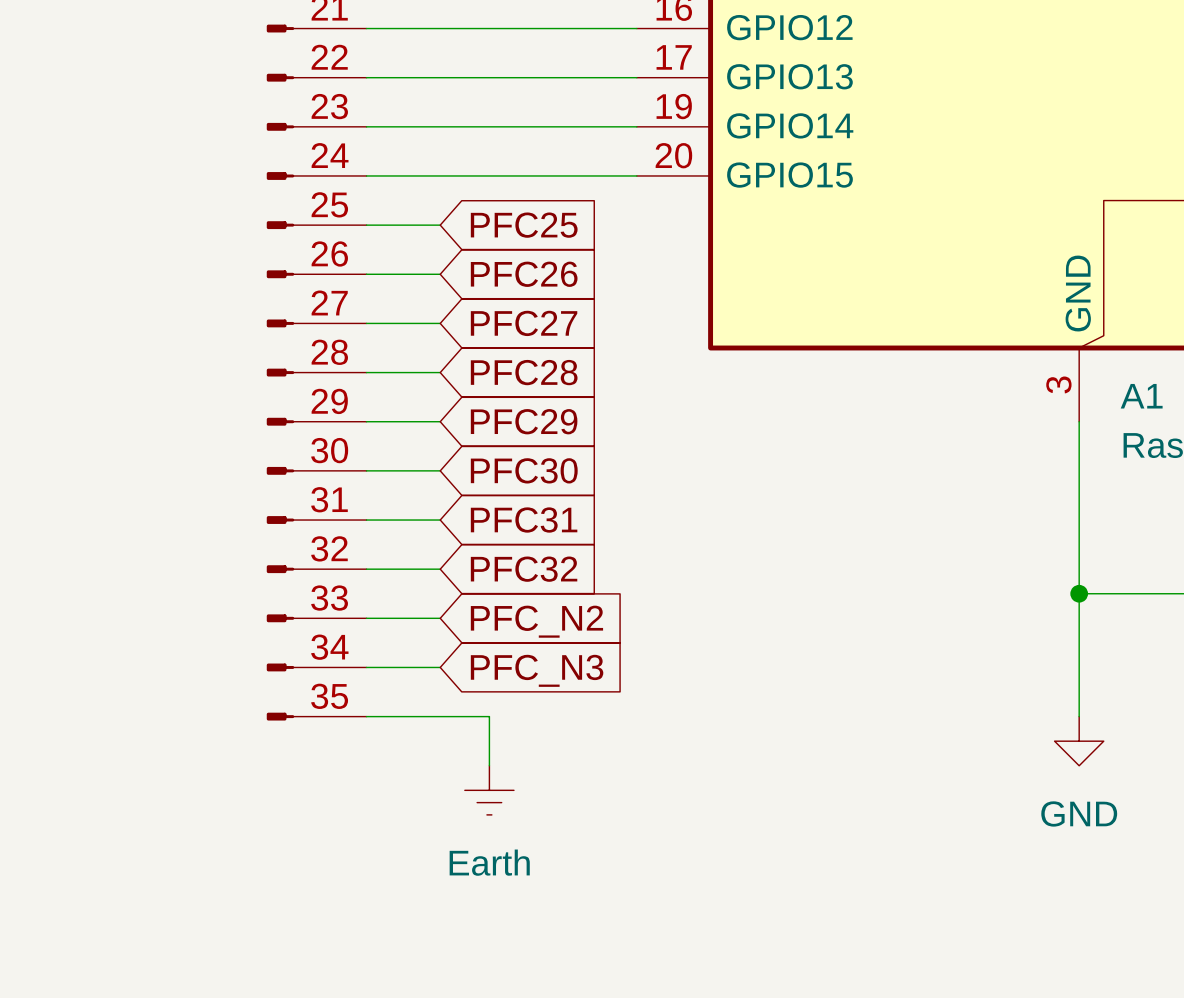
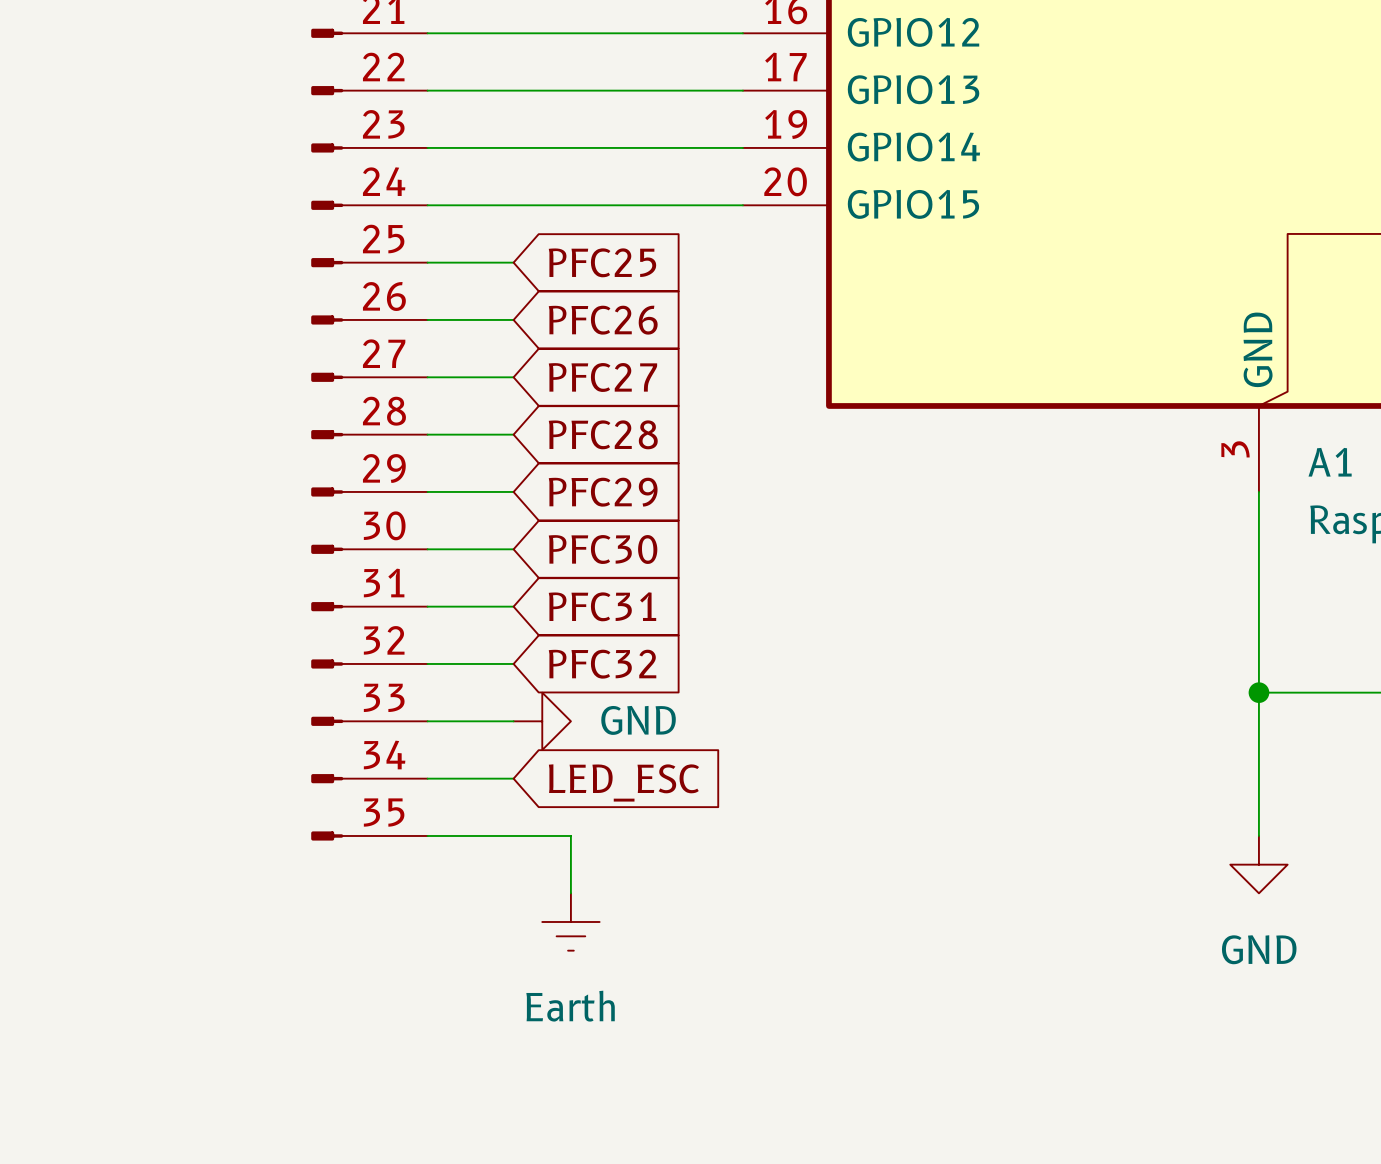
power symbol: none -> GND (542, 721)
global label: PFC_N2 (536, 621) -> none
global label: PFC_N3 (537, 670) -> LED_ESC (623, 782)

